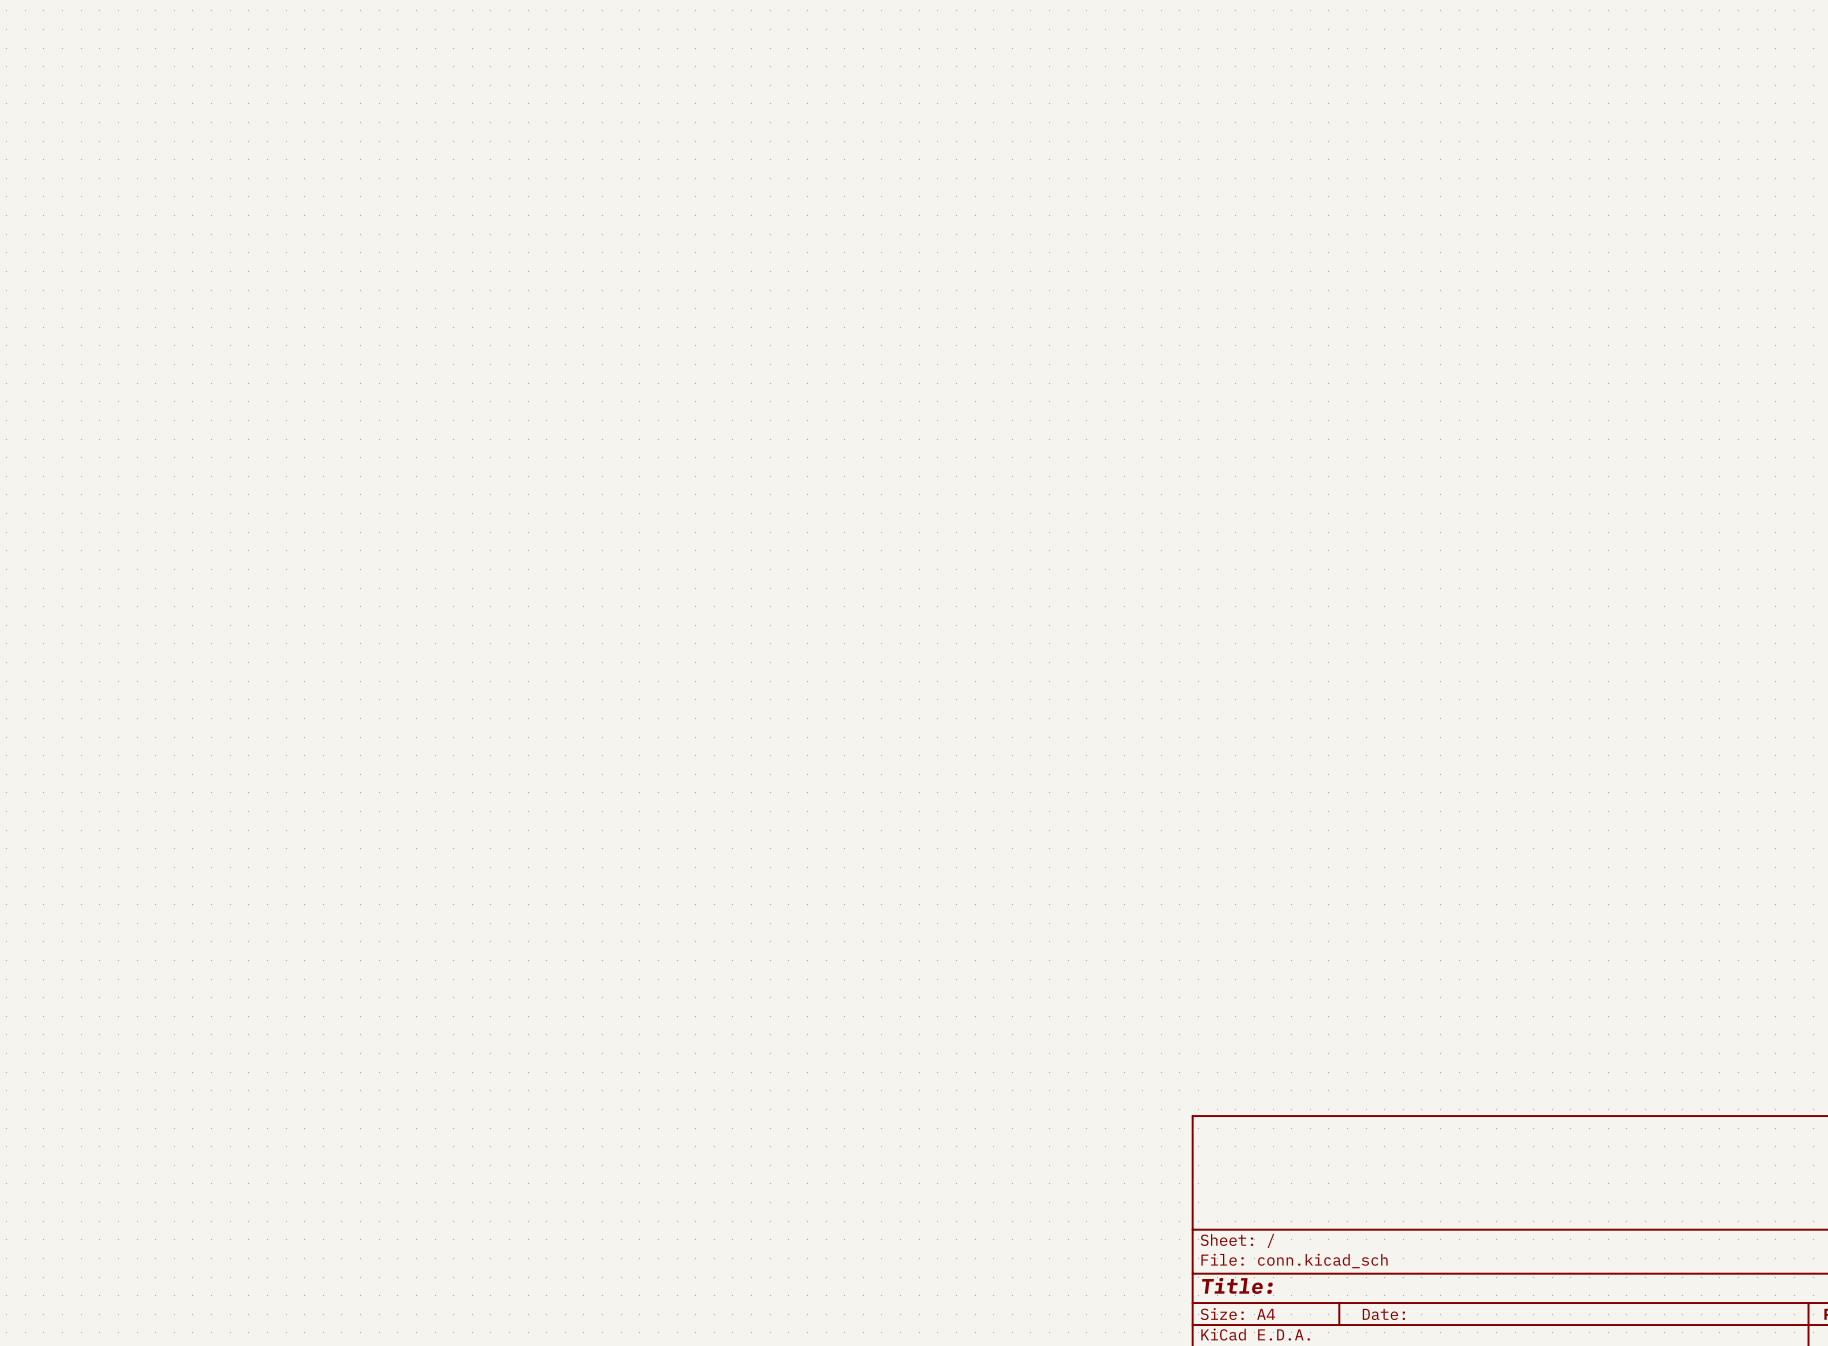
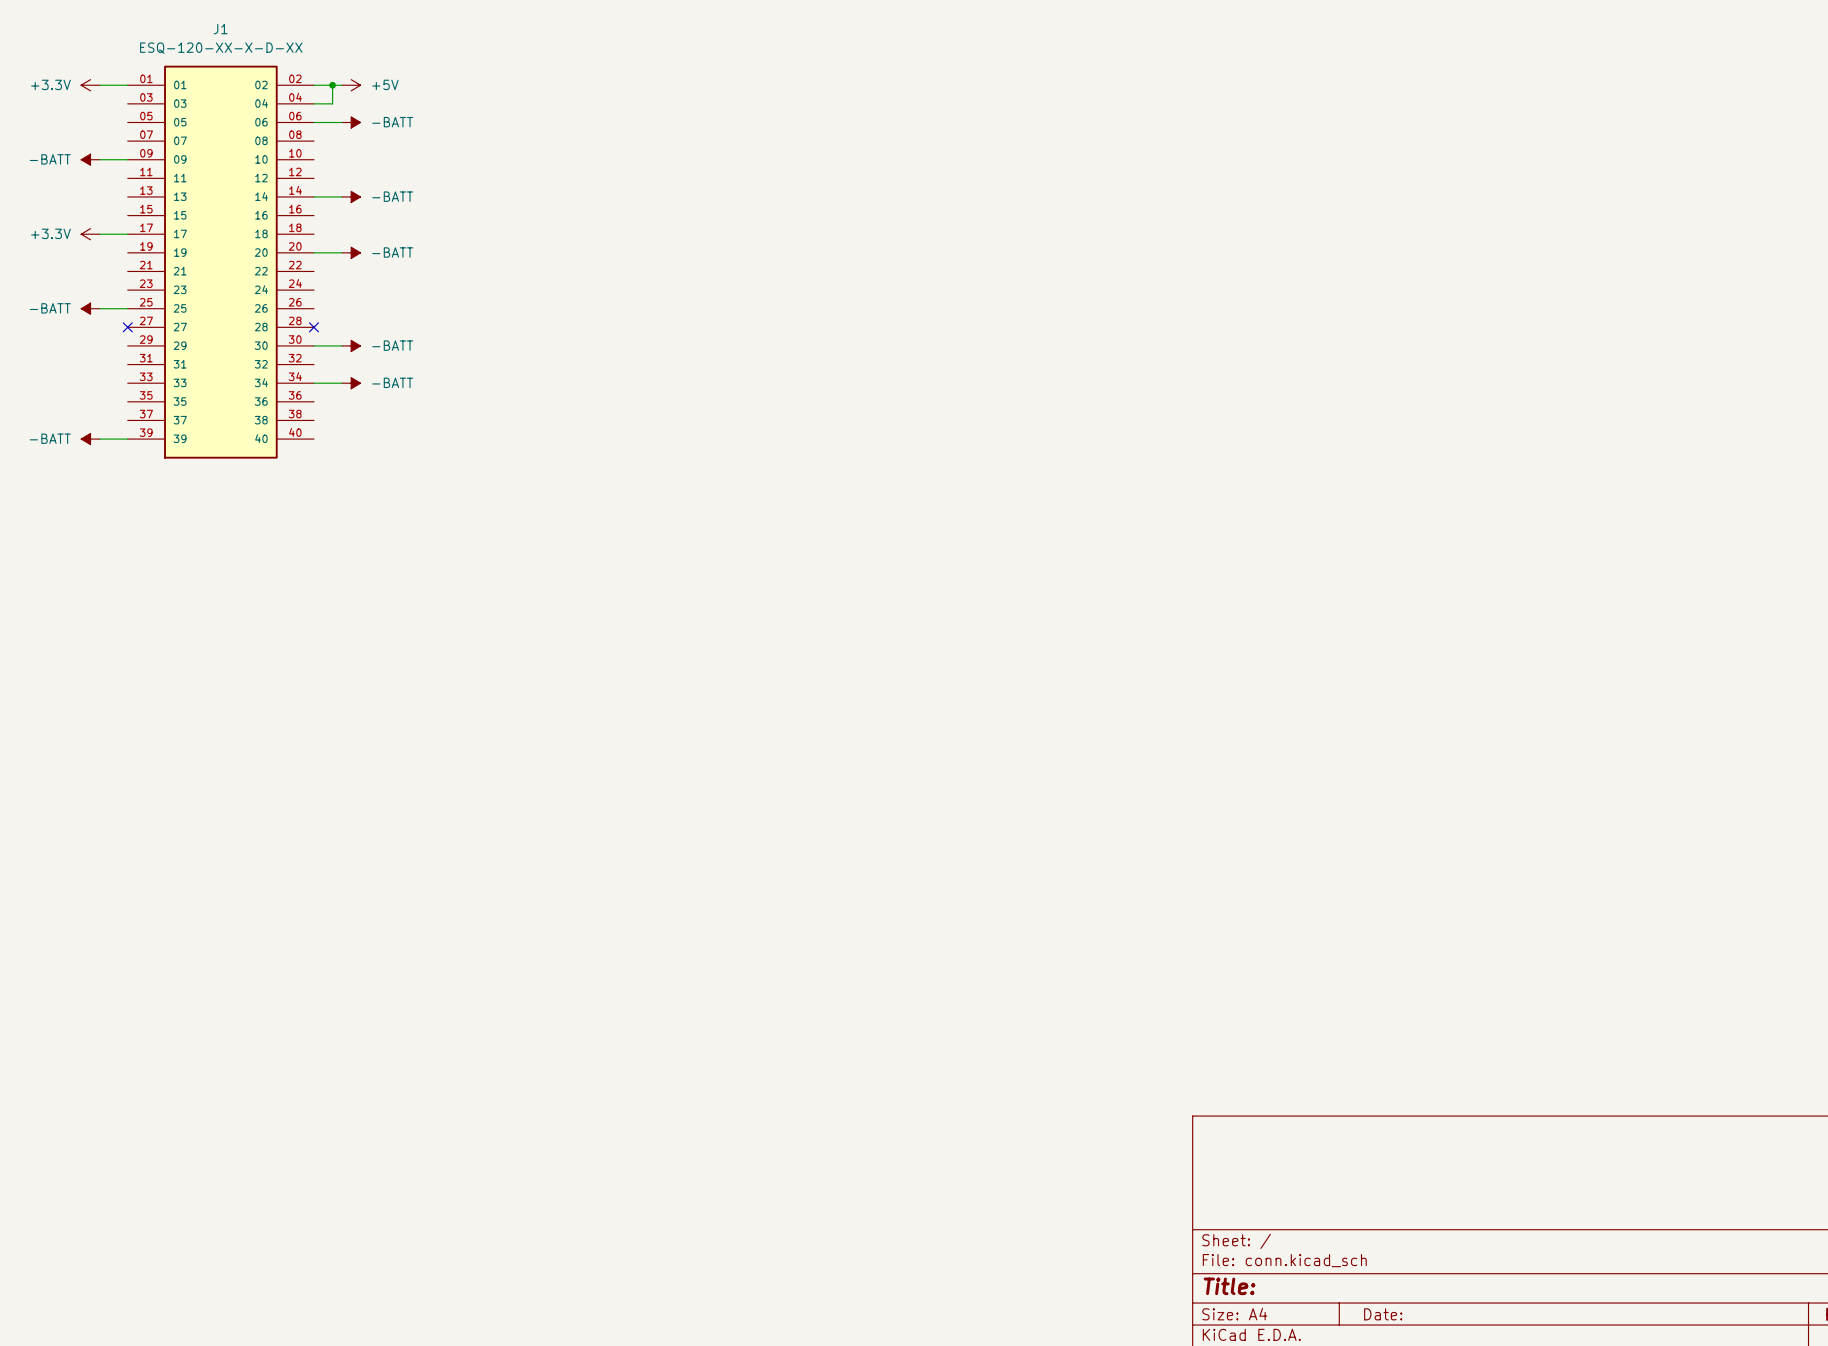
power symbol: none -> +3.3V (90, 85)
wire: none -> (99, 85) (127, 85)
wire: none -> (313, 85) (341, 85)
wire: none -> (332, 85) (332, 103) (313, 103)
junction: none -> (332, 85)
power symbol: none -> +5V (351, 85)
wire: none -> (313, 122) (341, 122)
power symbol: none -> -BATT (351, 122)
power symbol: none -> -BATT (90, 159)
wire: none -> (99, 159) (127, 159)
wire: none -> (313, 196) (341, 196)
power symbol: none -> -BATT (351, 196)
power symbol: none -> +3.3V (90, 234)
wire: none -> (99, 234) (127, 234)
wire: none -> (313, 252) (341, 252)
power symbol: none -> -BATT (351, 252)
J1: none -> ESQ-120-XX-X-D-XX (220, 262)
power symbol: none -> -BATT (90, 308)
wire: none -> (99, 308) (127, 308)
no-connect mark: none -> (127, 327)
no-connect mark: none -> (313, 327)
wire: none -> (313, 345) (341, 345)
power symbol: none -> -BATT (351, 345)
wire: none -> (313, 383) (341, 383)
power symbol: none -> -BATT (351, 383)
power symbol: none -> -BATT (90, 439)
wire: none -> (99, 439) (127, 439)

